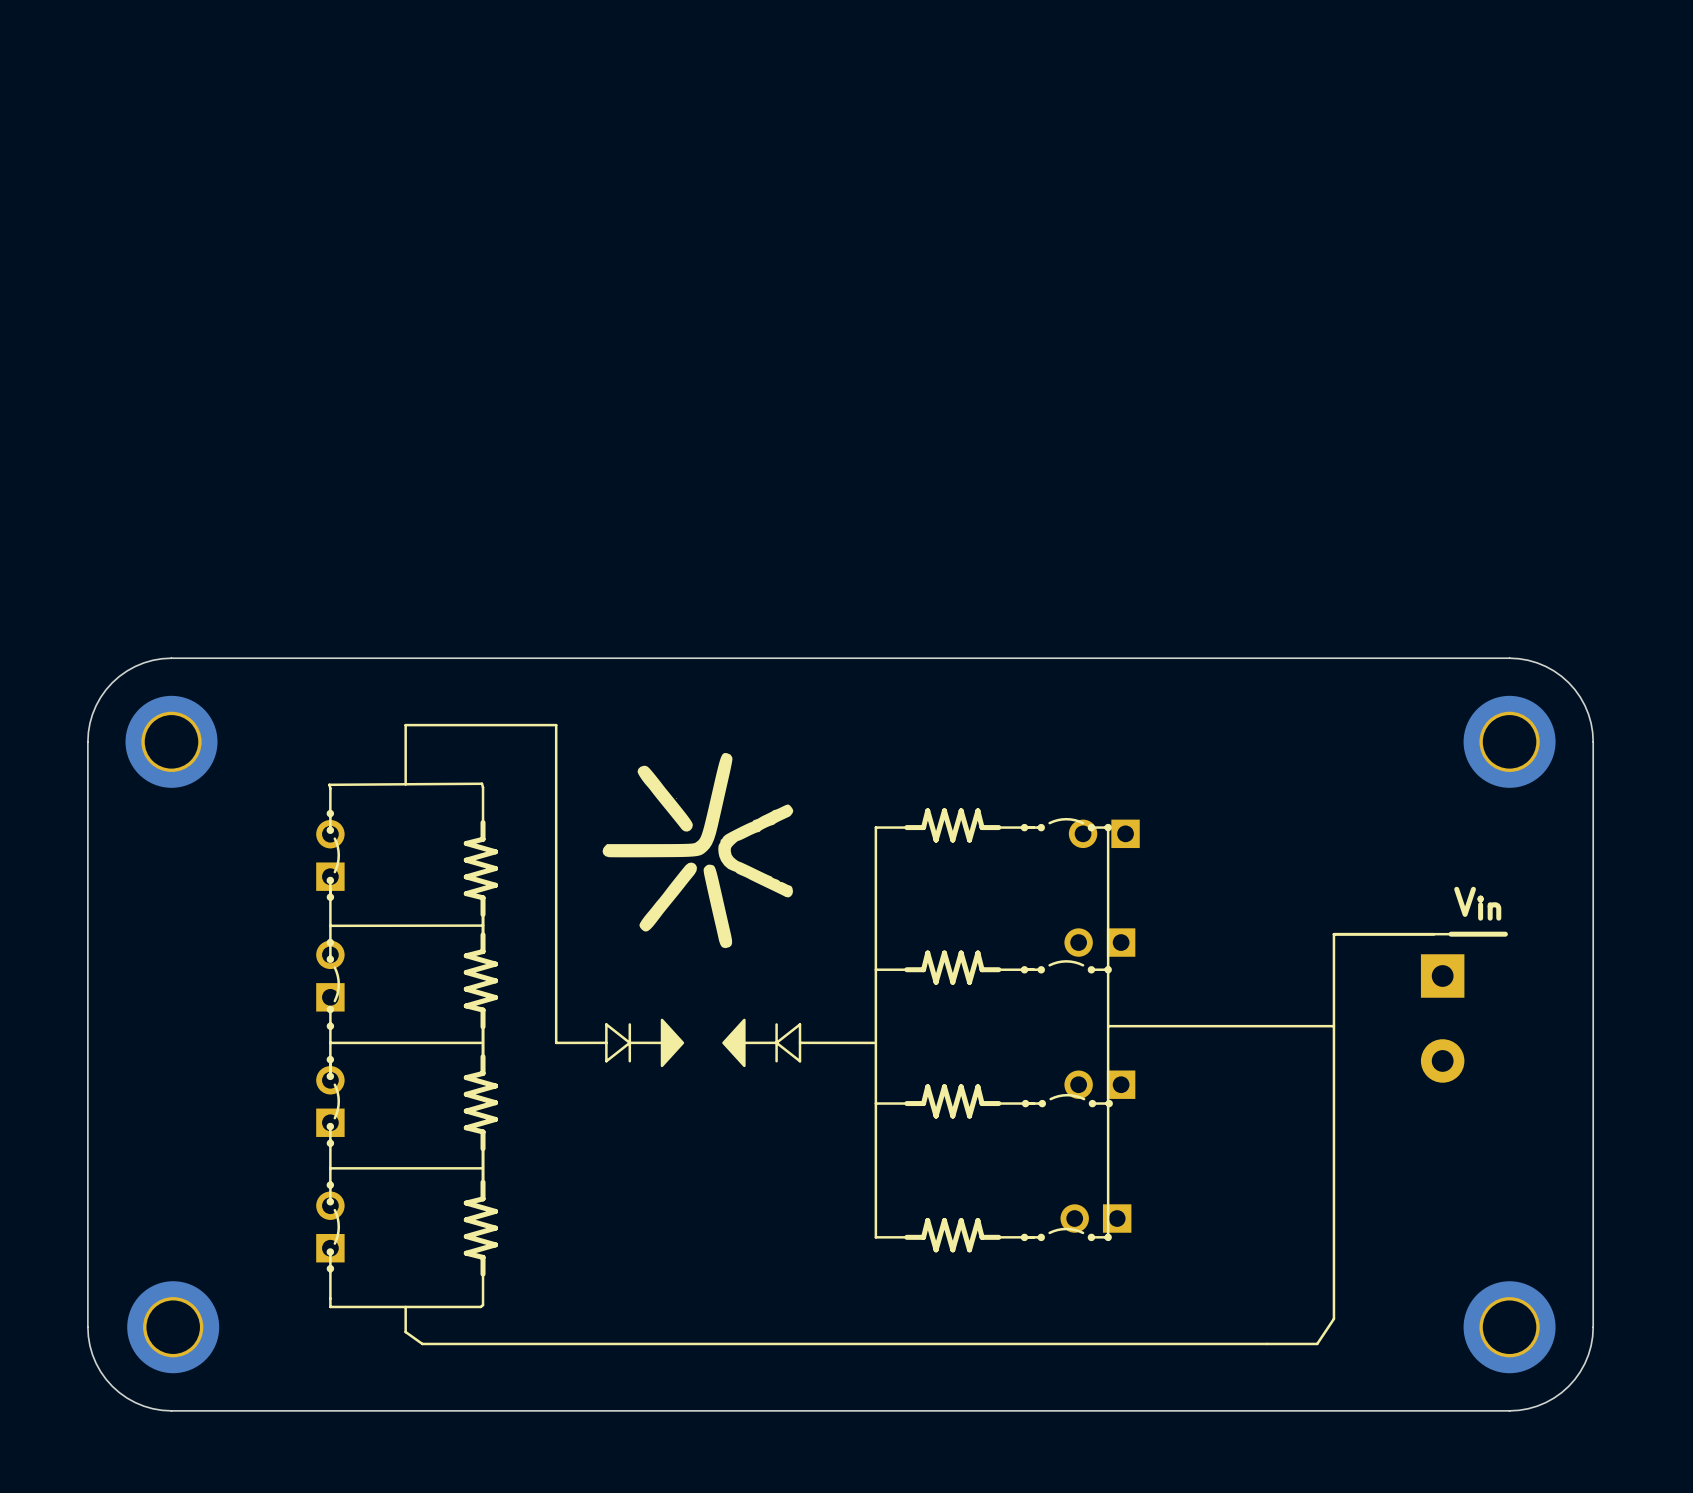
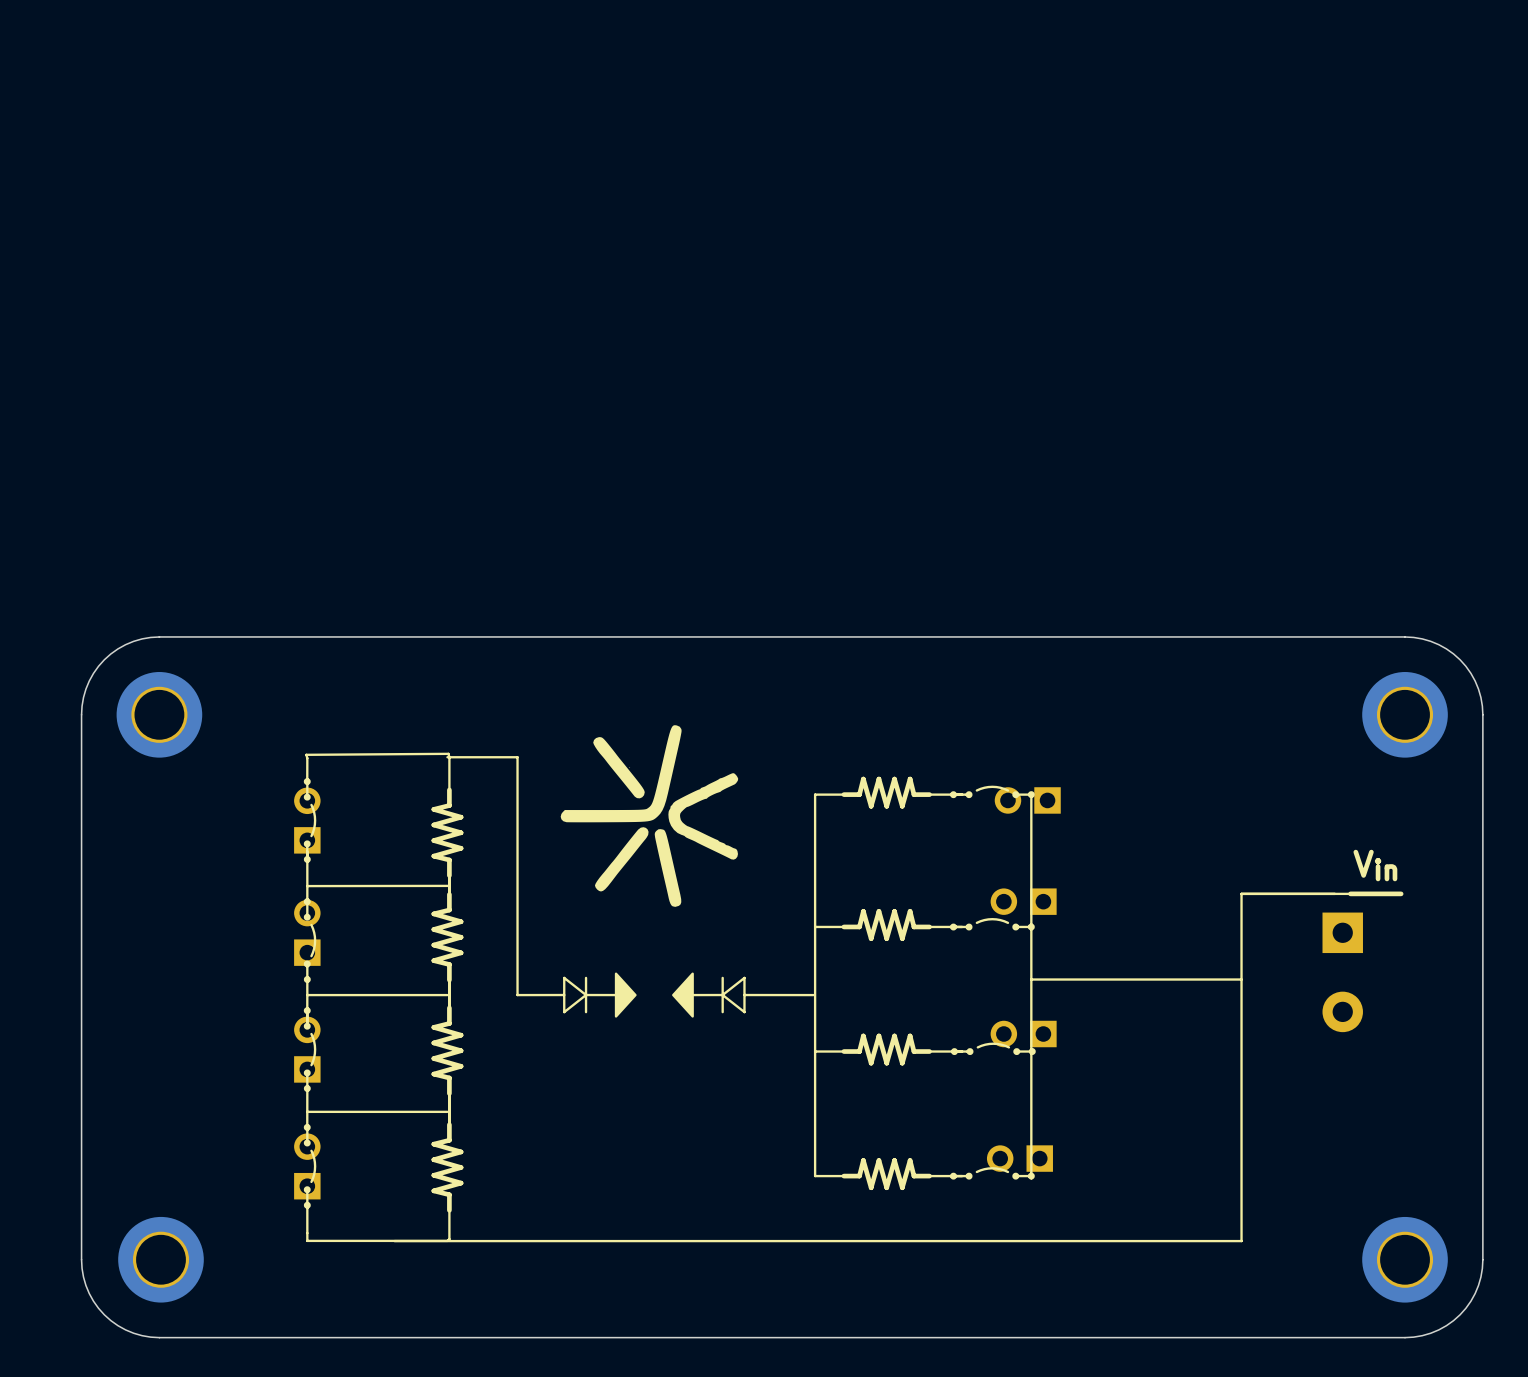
line: (405, 784) (405, 725) (556, 725) (556, 787) -> (447, 757) (517, 757)
line: (405, 1306) (405, 1332) (422, 1343) (1317, 1343) (1333, 1318) (1333, 1307) -> (394, 1241) (1241, 1241)

